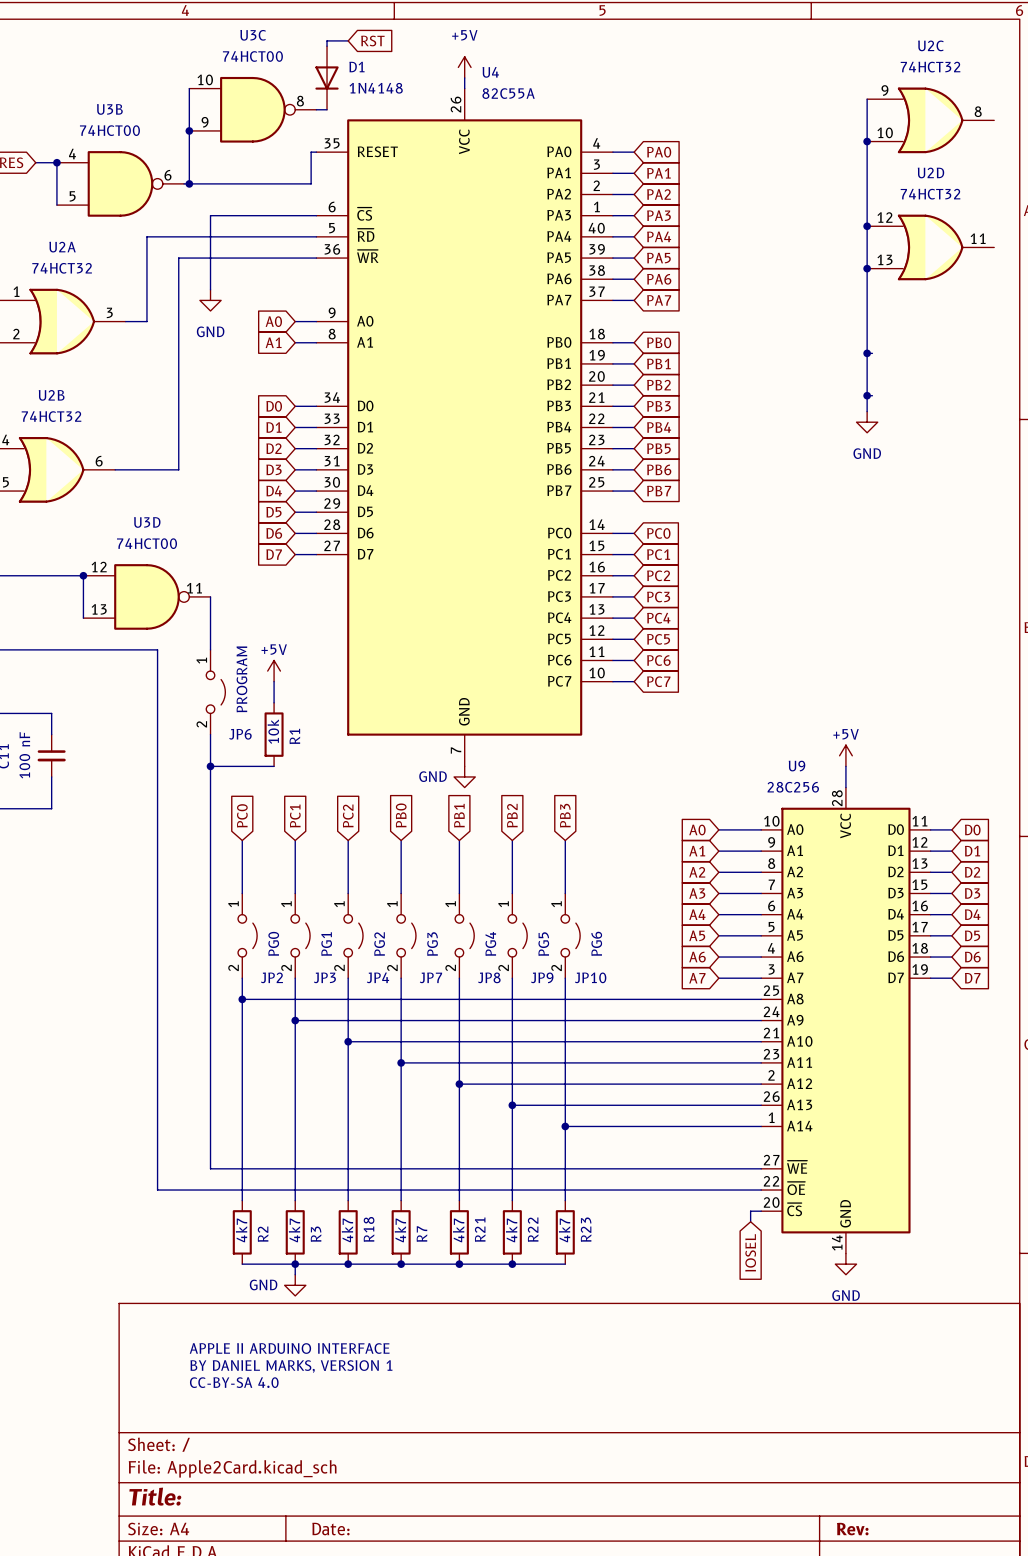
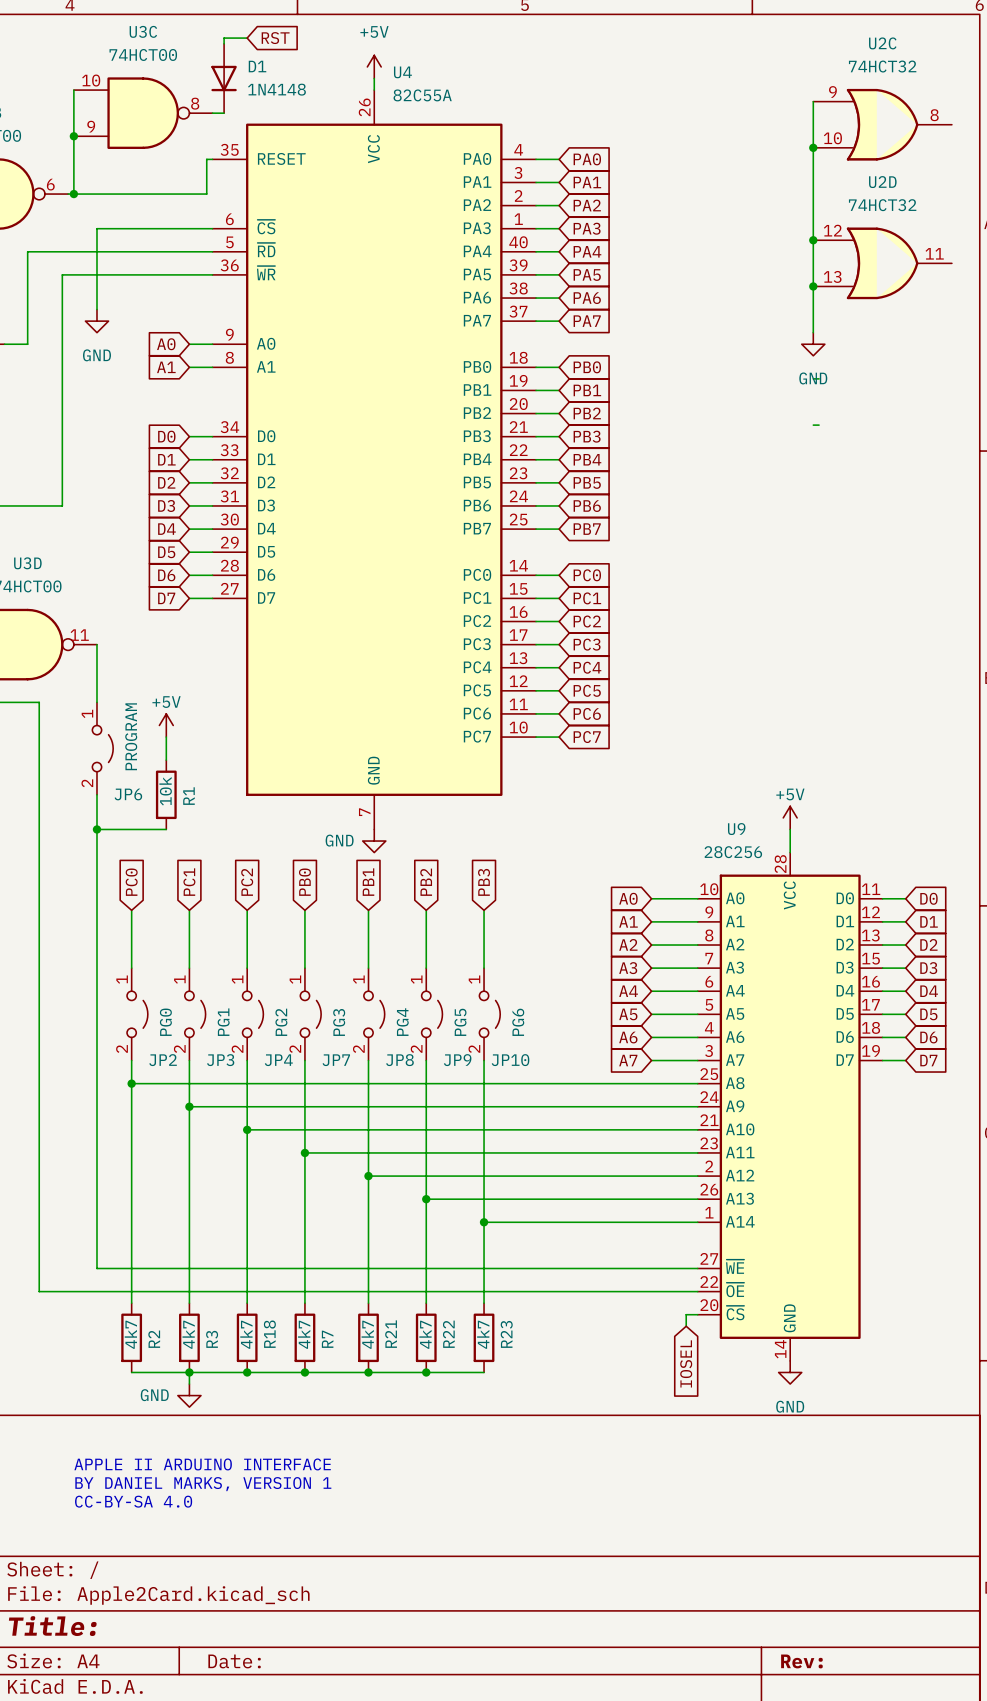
wire: (867, 310) (867, 411) -> none
junction: (867, 353) -> none
junction: (867, 395) -> none
power symbol position: GND (867, 422) -> GND (813, 344)

